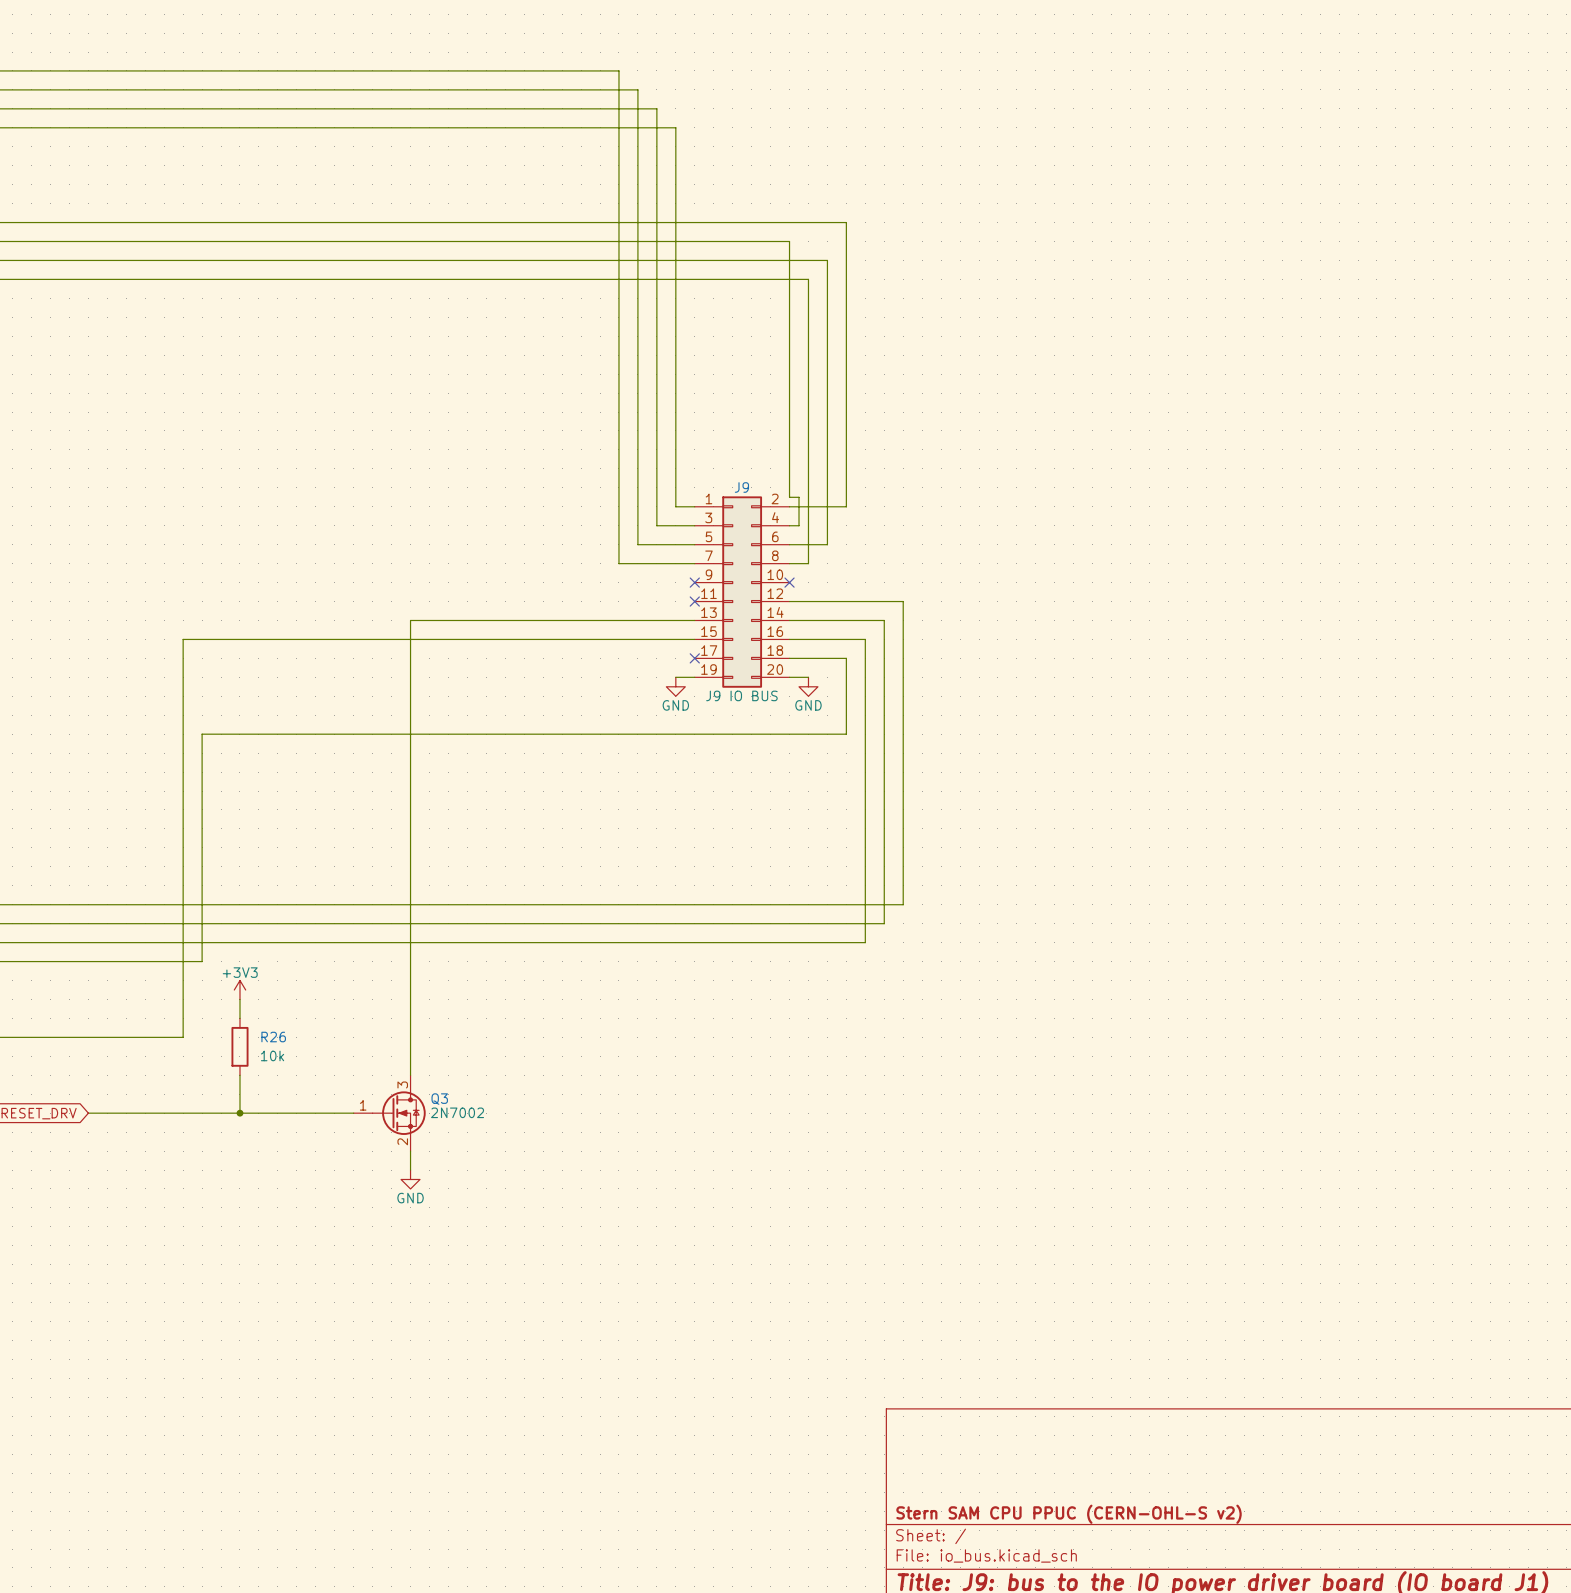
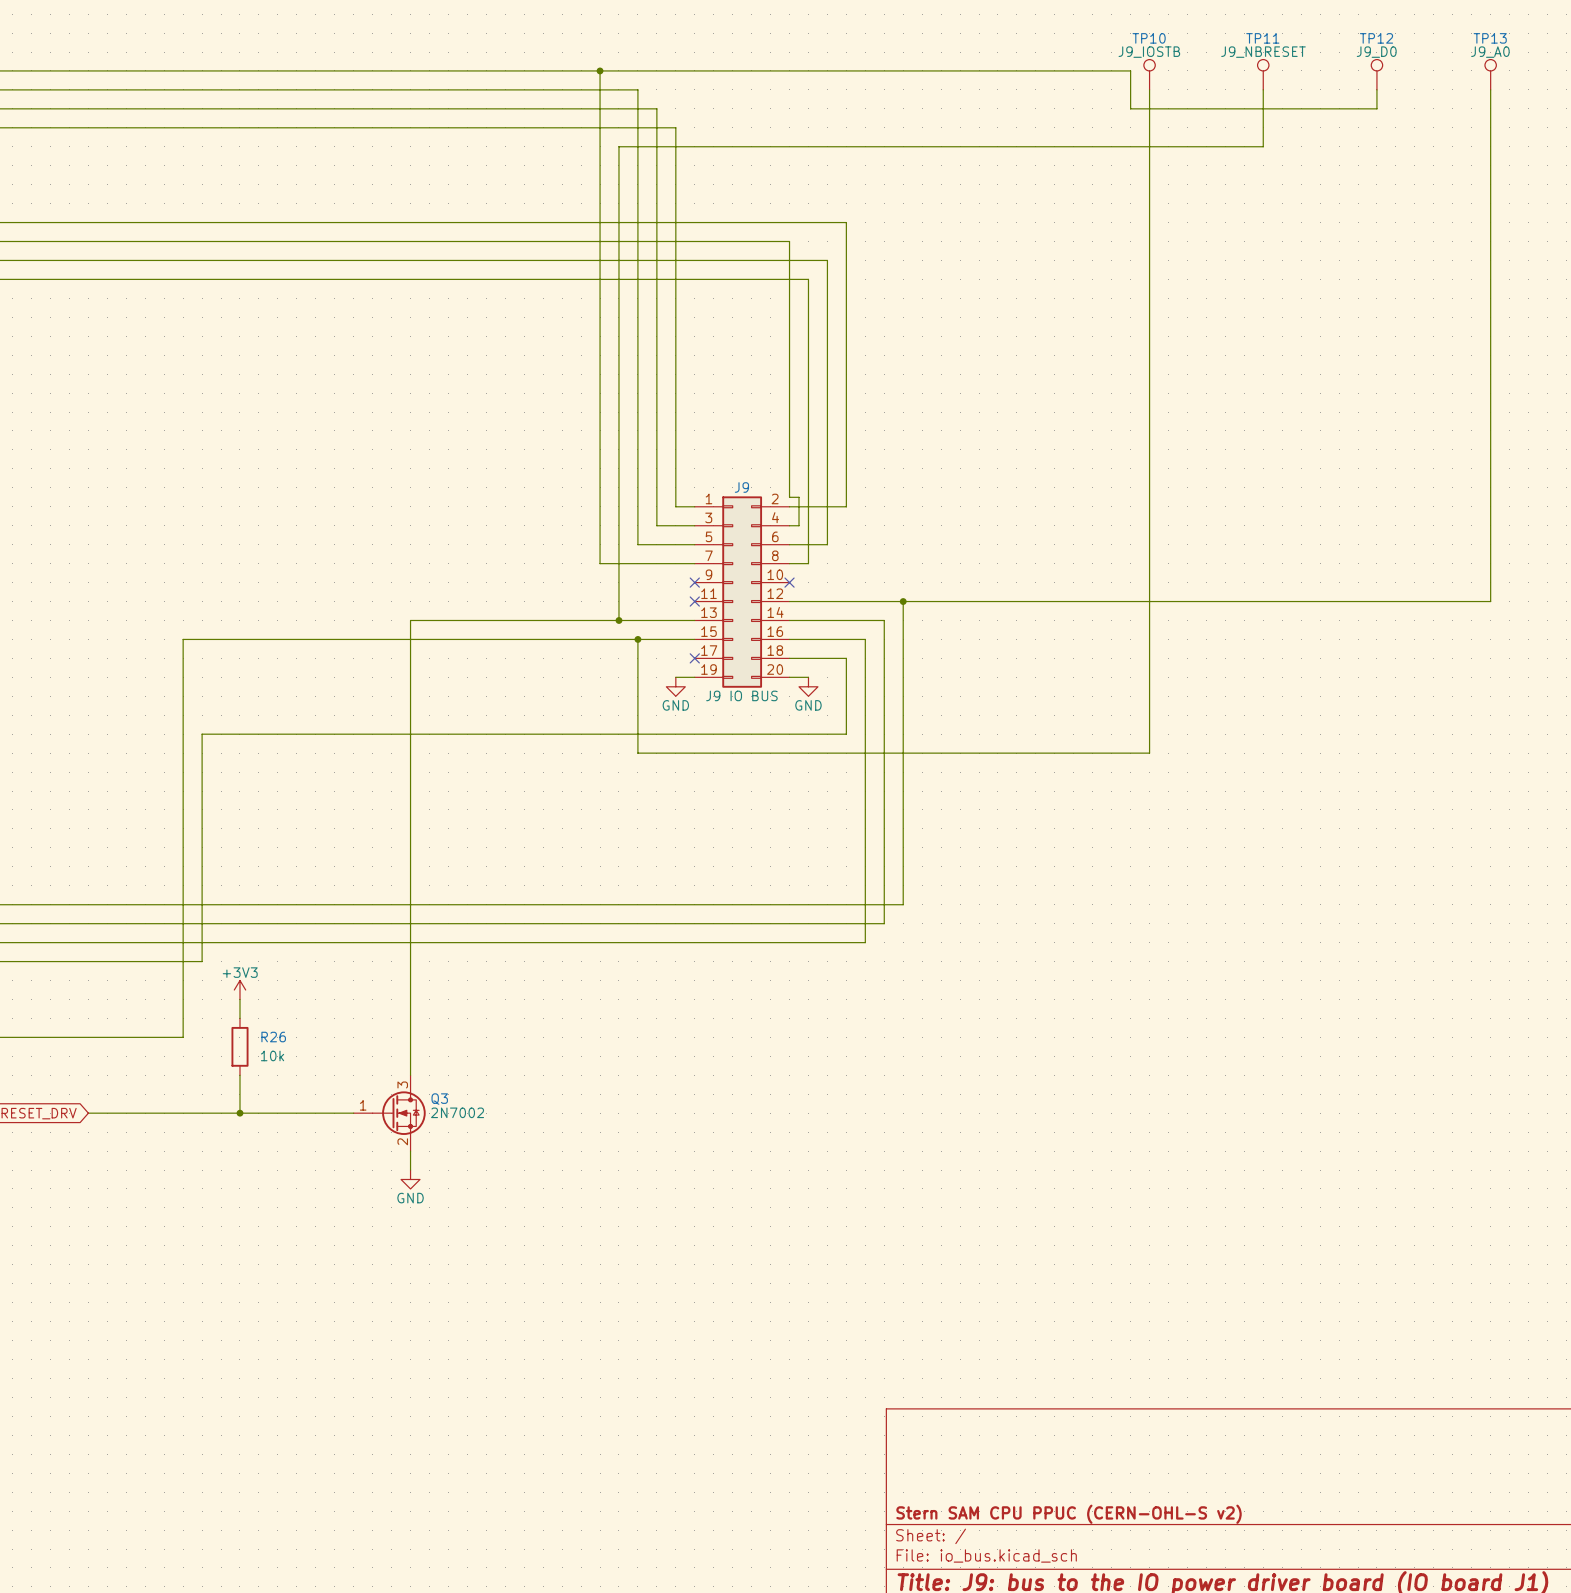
wire: none -> (600, 70) (600, 563) (618, 563) (618, 620)
junction: none -> (600, 70)
wire: (618, 70) (618, 146) -> (1263, 89) (1263, 146) (618, 146)
wire: none -> (618, 70) (1130, 70) (1130, 108) (1376, 108) (1376, 89)
TP10: none -> J9_IOSTB (1149, 74)
TP11: none -> J9_NBRESET (1263, 74)
TP12: none -> J9_D0 (1376, 74)
TP13: none -> J9_A0 (1490, 74)
wire: none -> (1149, 89) (1149, 753) (637, 753) (637, 639)
wire: none -> (1490, 89) (1490, 601) (903, 601)
junction: none -> (903, 601)
junction: none -> (618, 620)
junction: none -> (637, 639)

